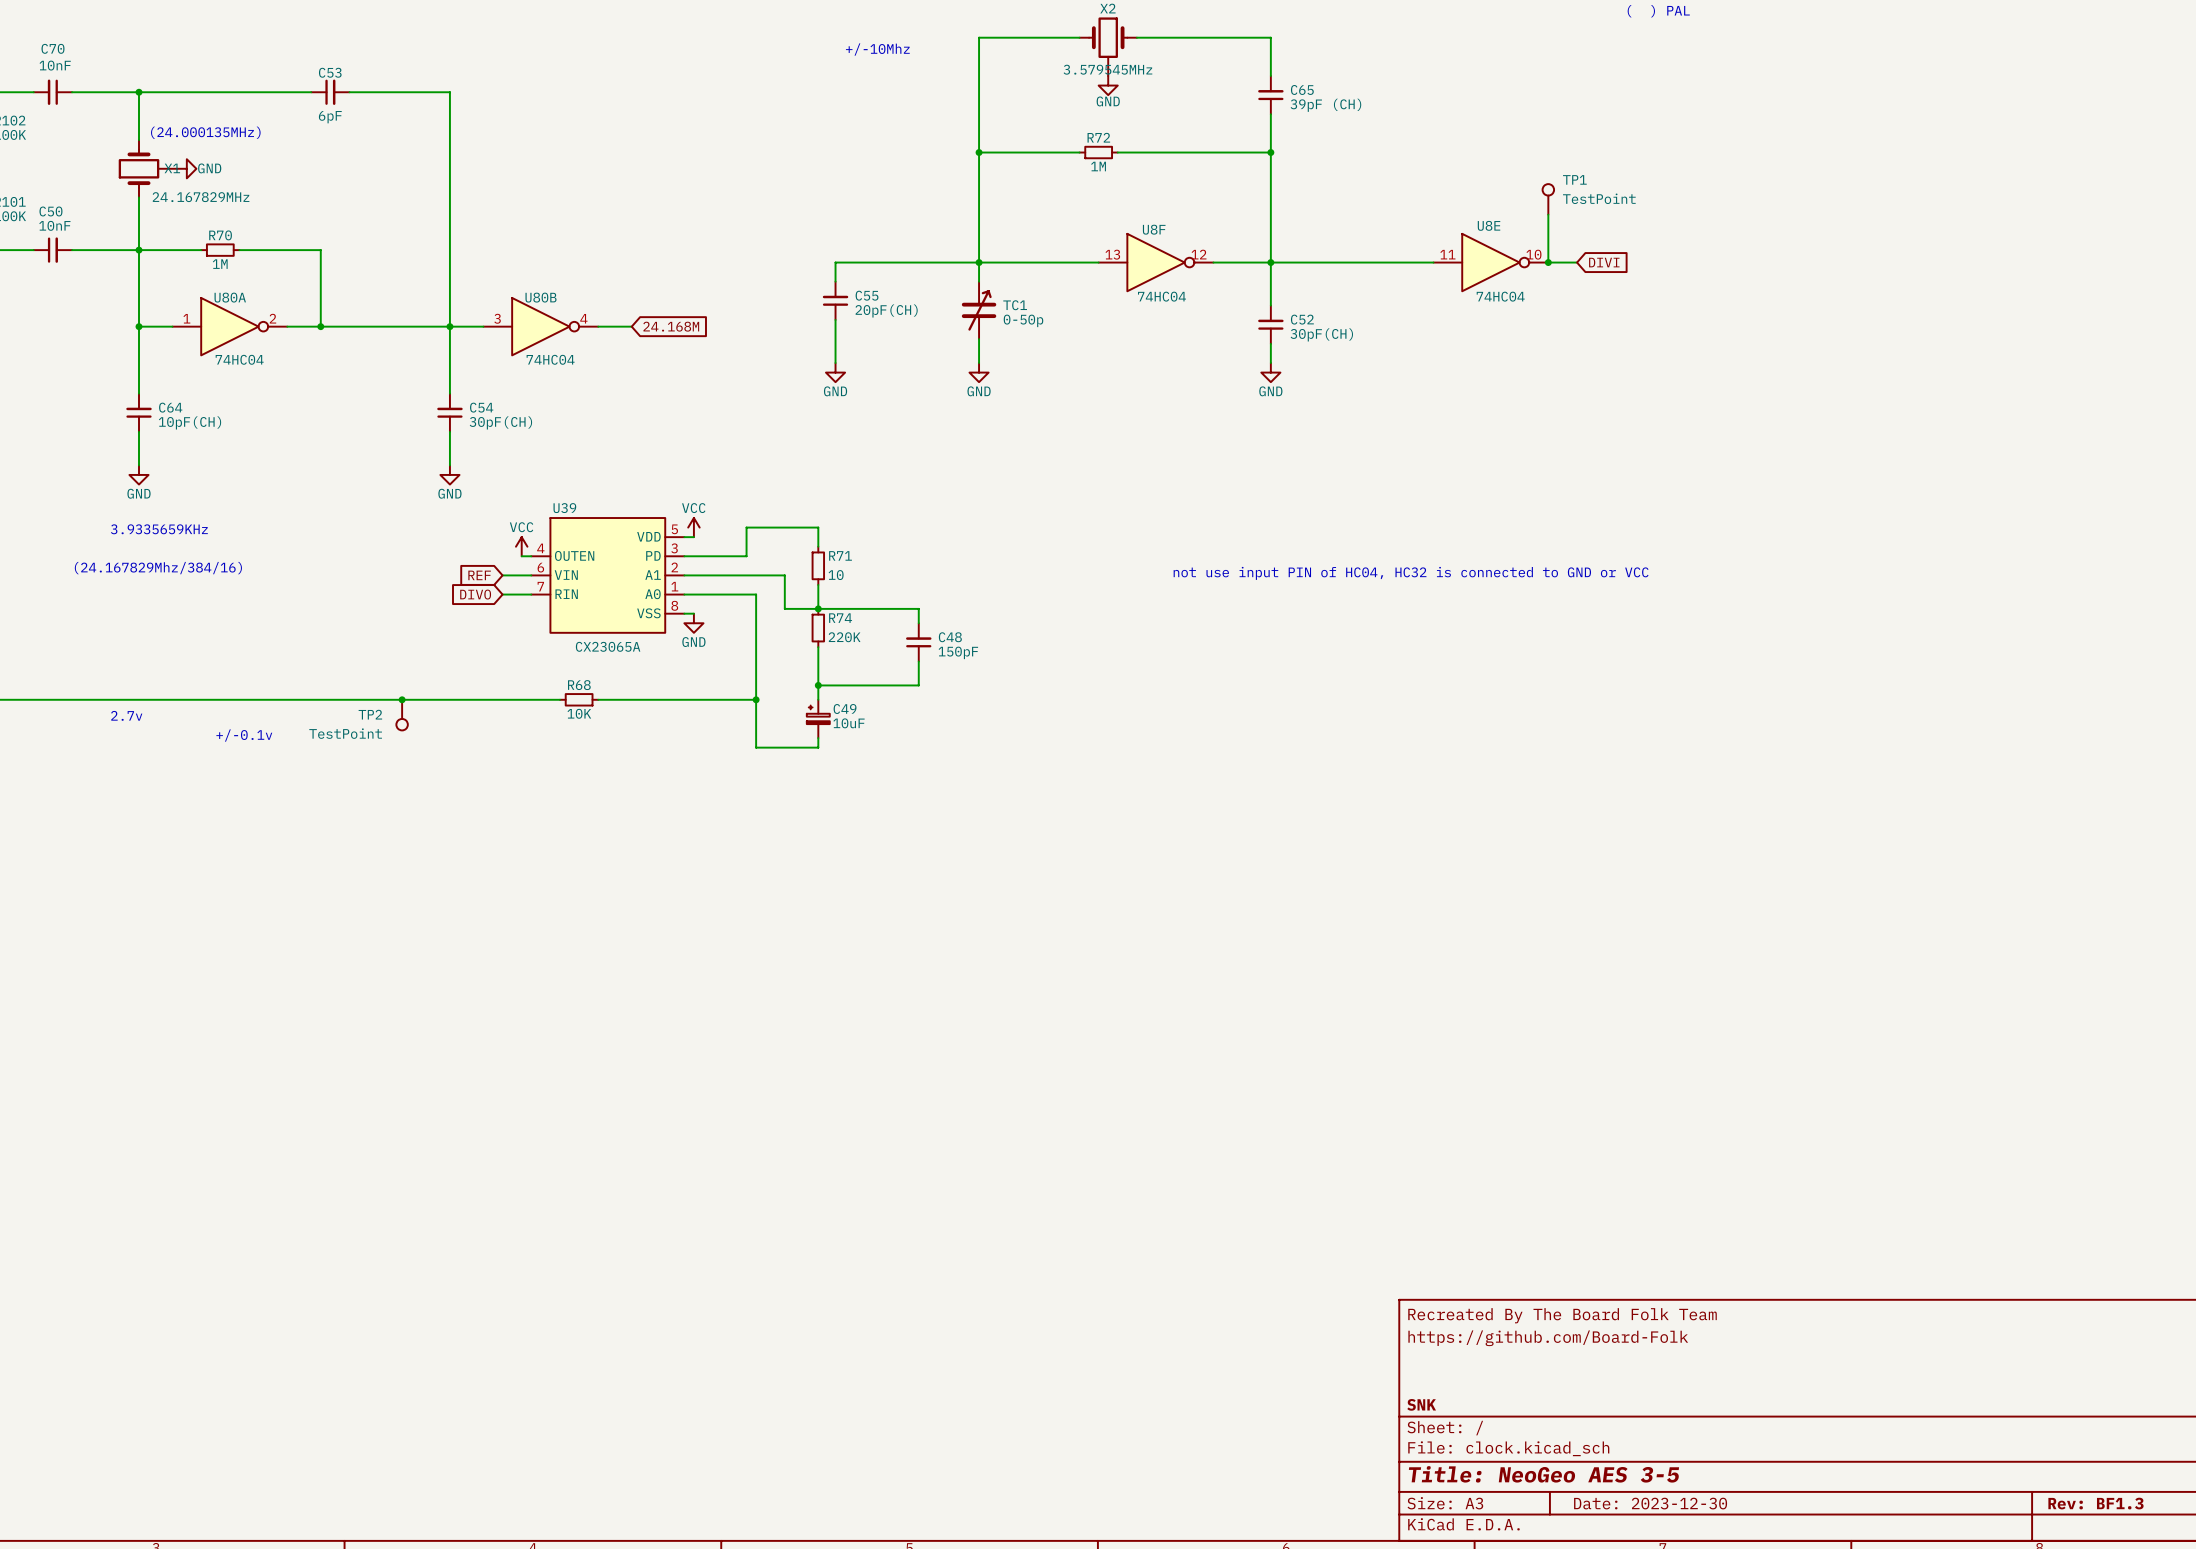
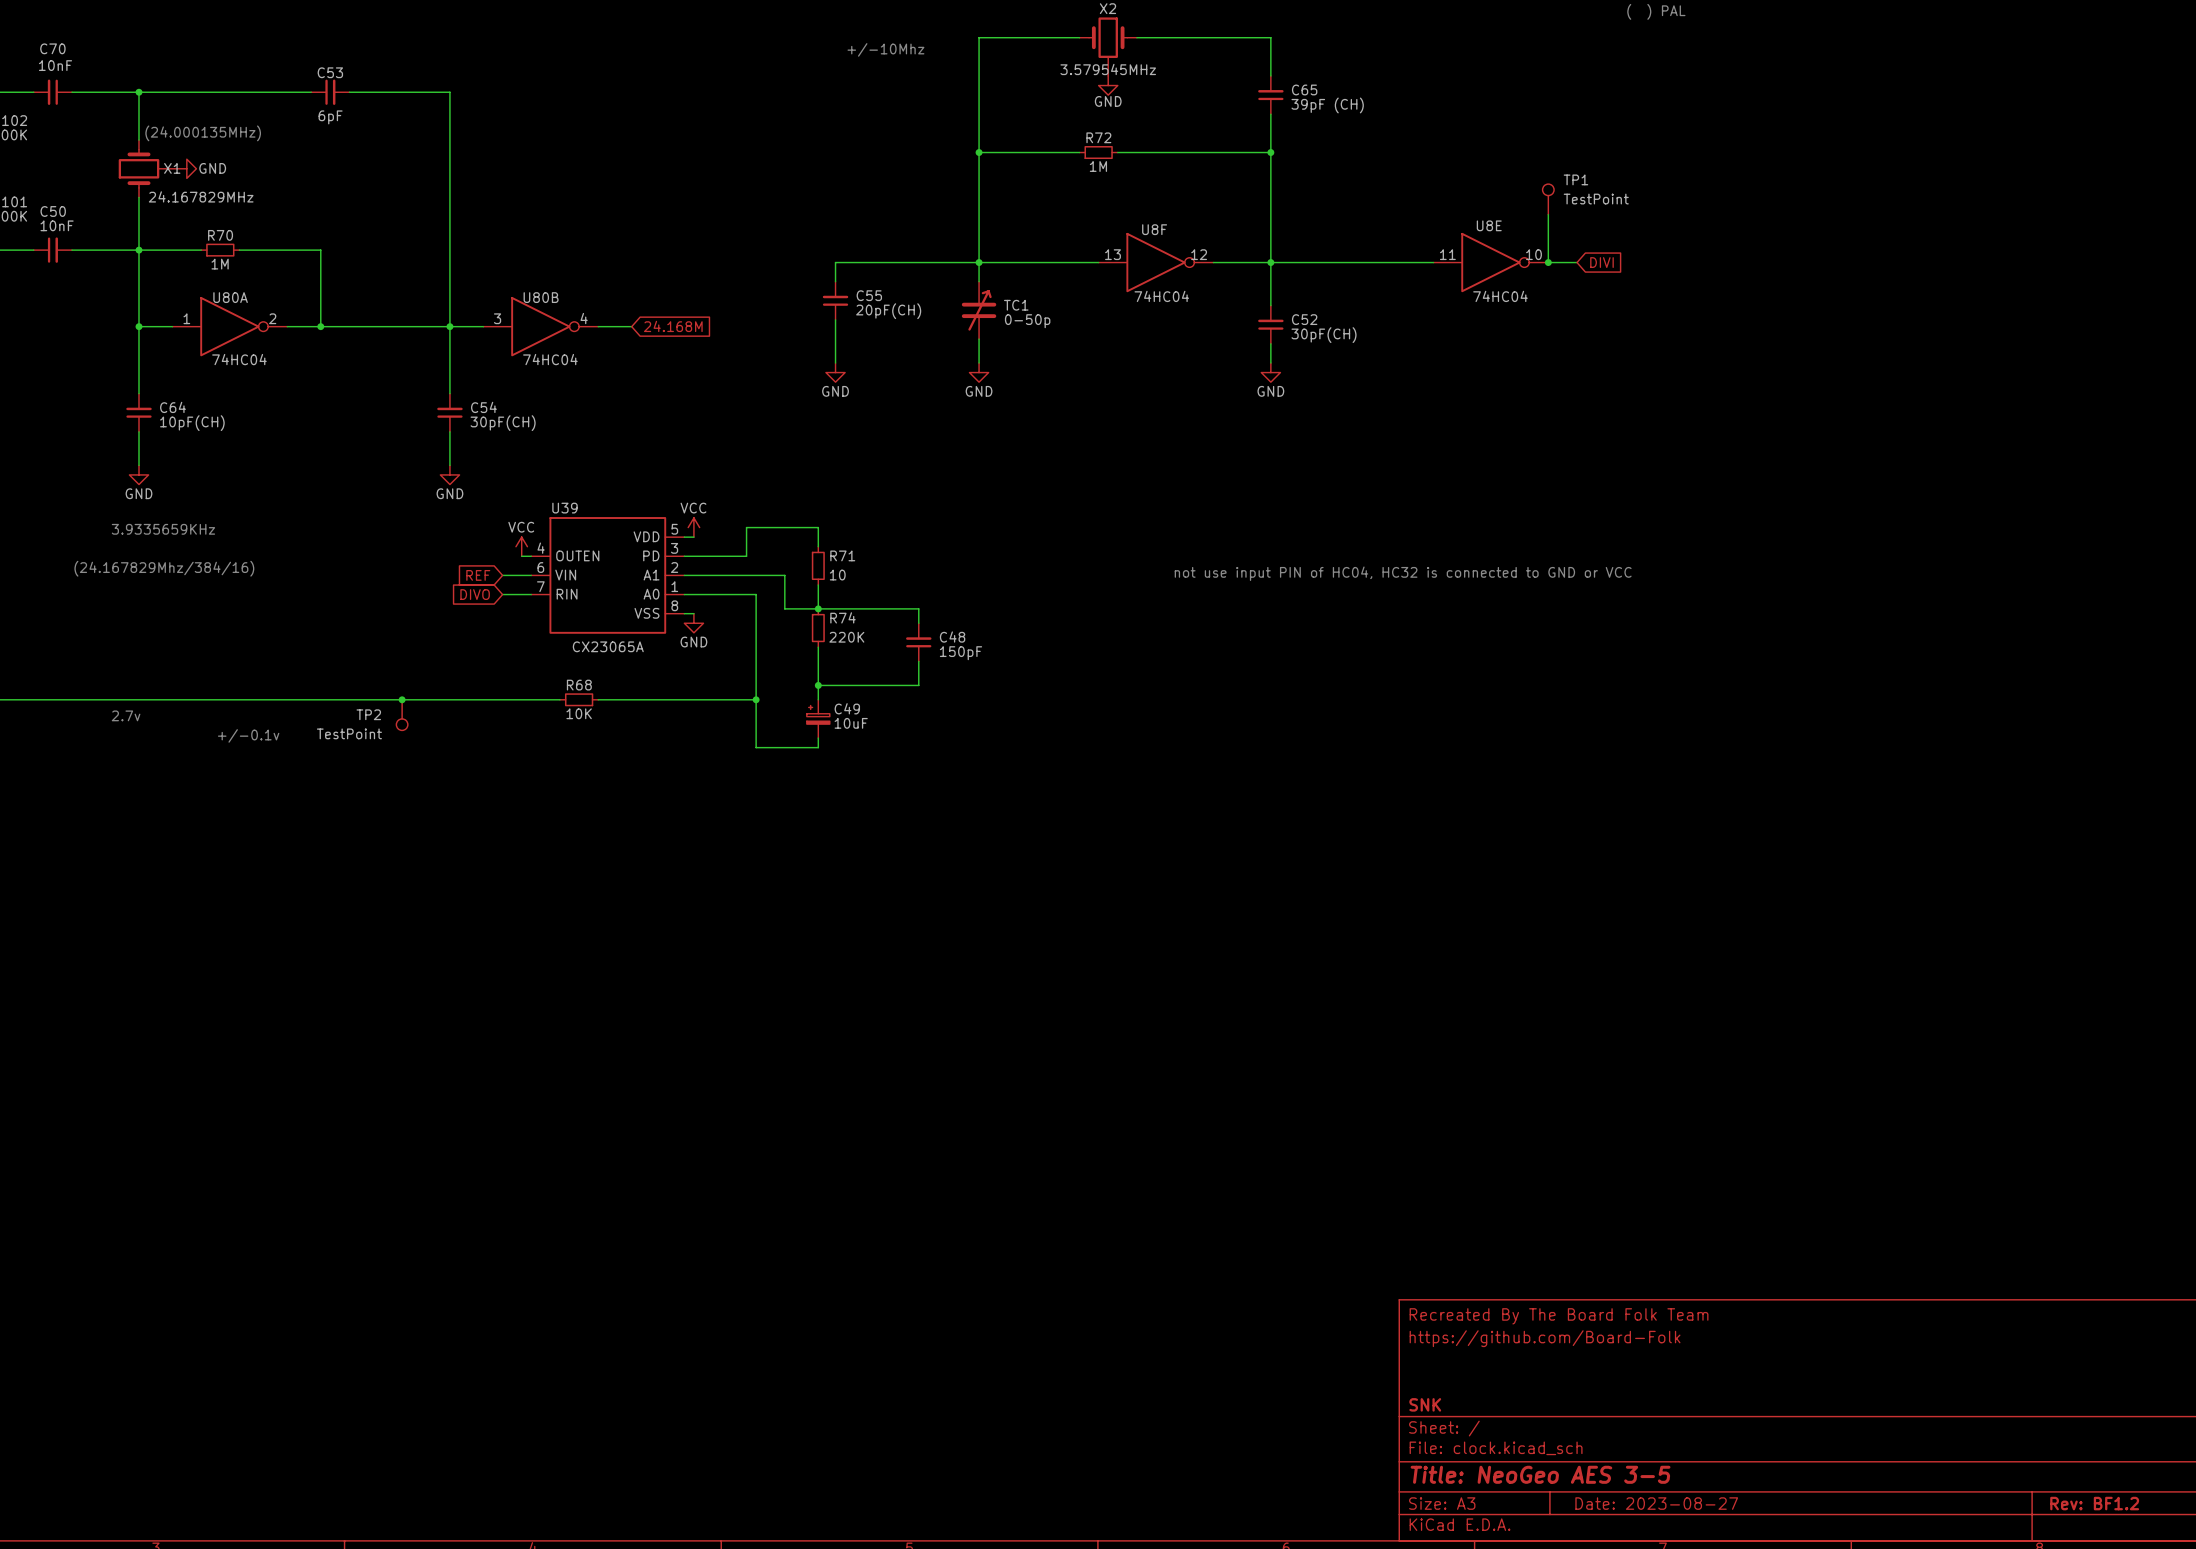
title block: Date: 2023-12-30 (1650, 1503) -> Date: 2023-08-27 (1656, 1503)
title block: Rev: BF1.3 (2095, 1503) -> Rev: BF1.2 (2094, 1503)

